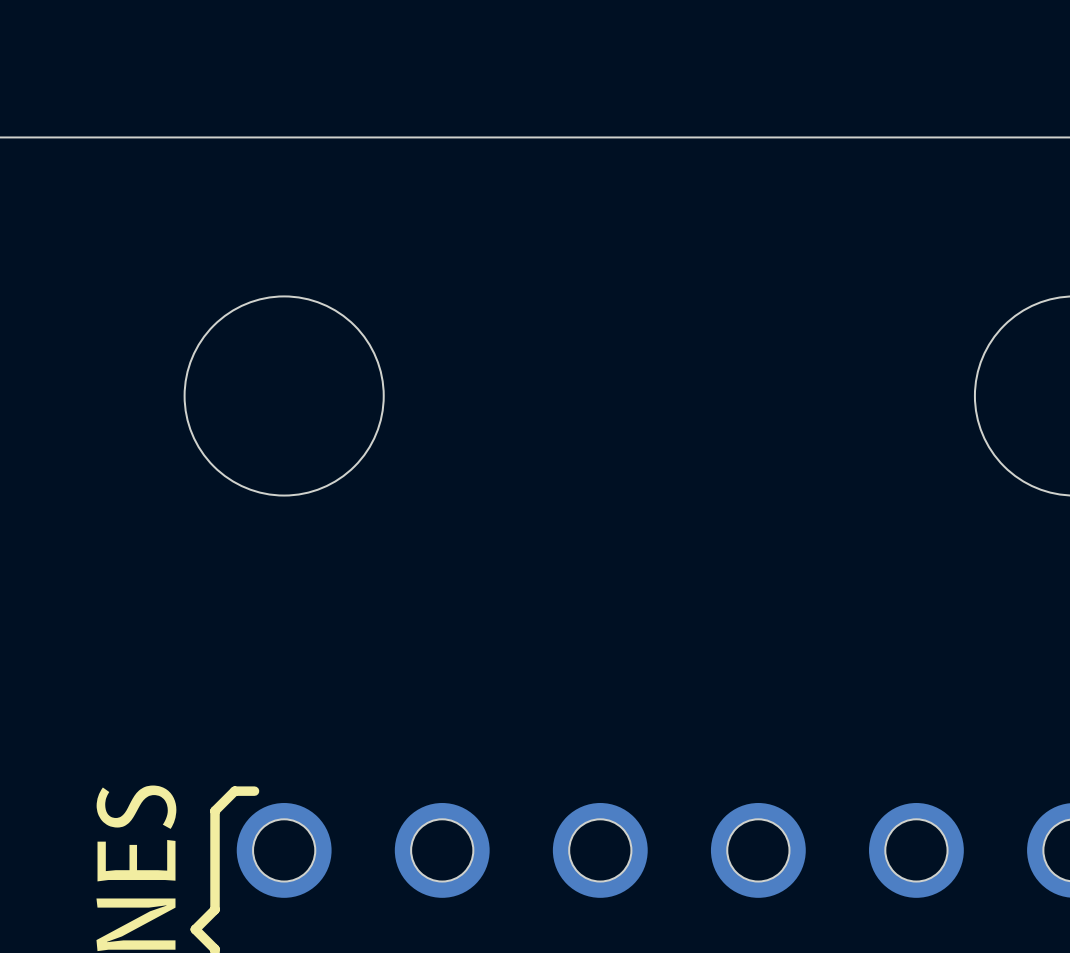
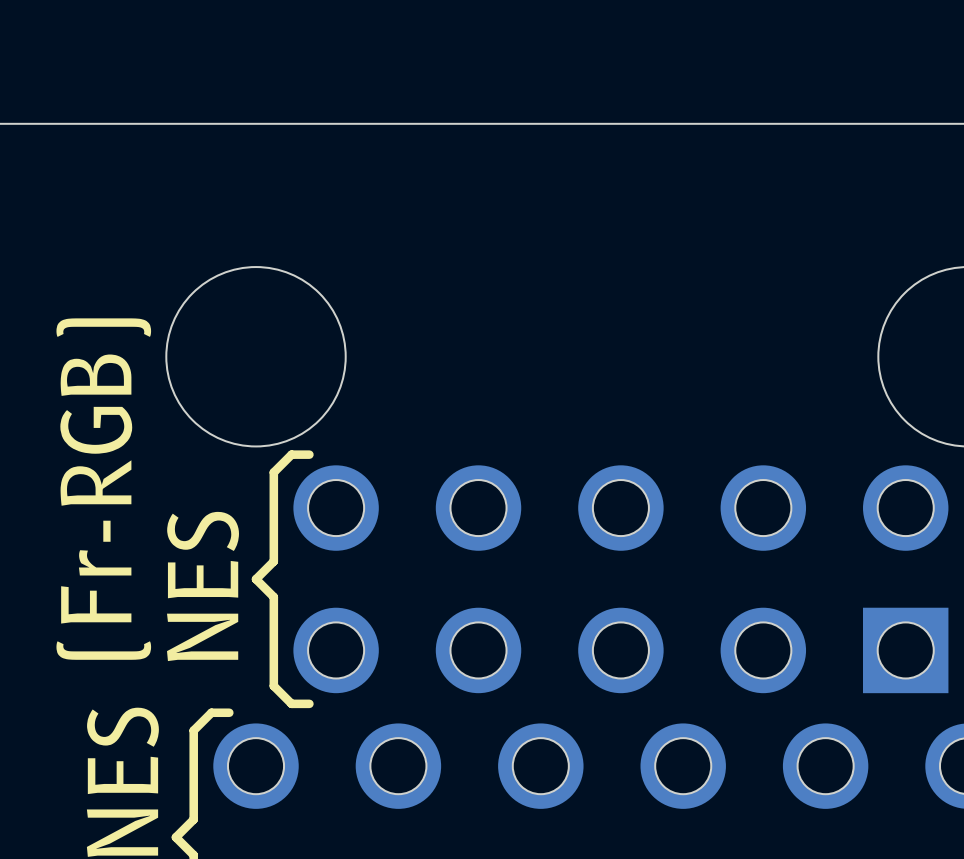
line: none -> (309, 454) (291, 454) (273, 472) (273, 561) (256, 579) (273, 597) (273, 686) (291, 703) (309, 703)
text: none -> (Fr-RGB) (103, 489)
part: none -> (620, 579)
text: none -> NES (203, 586)

